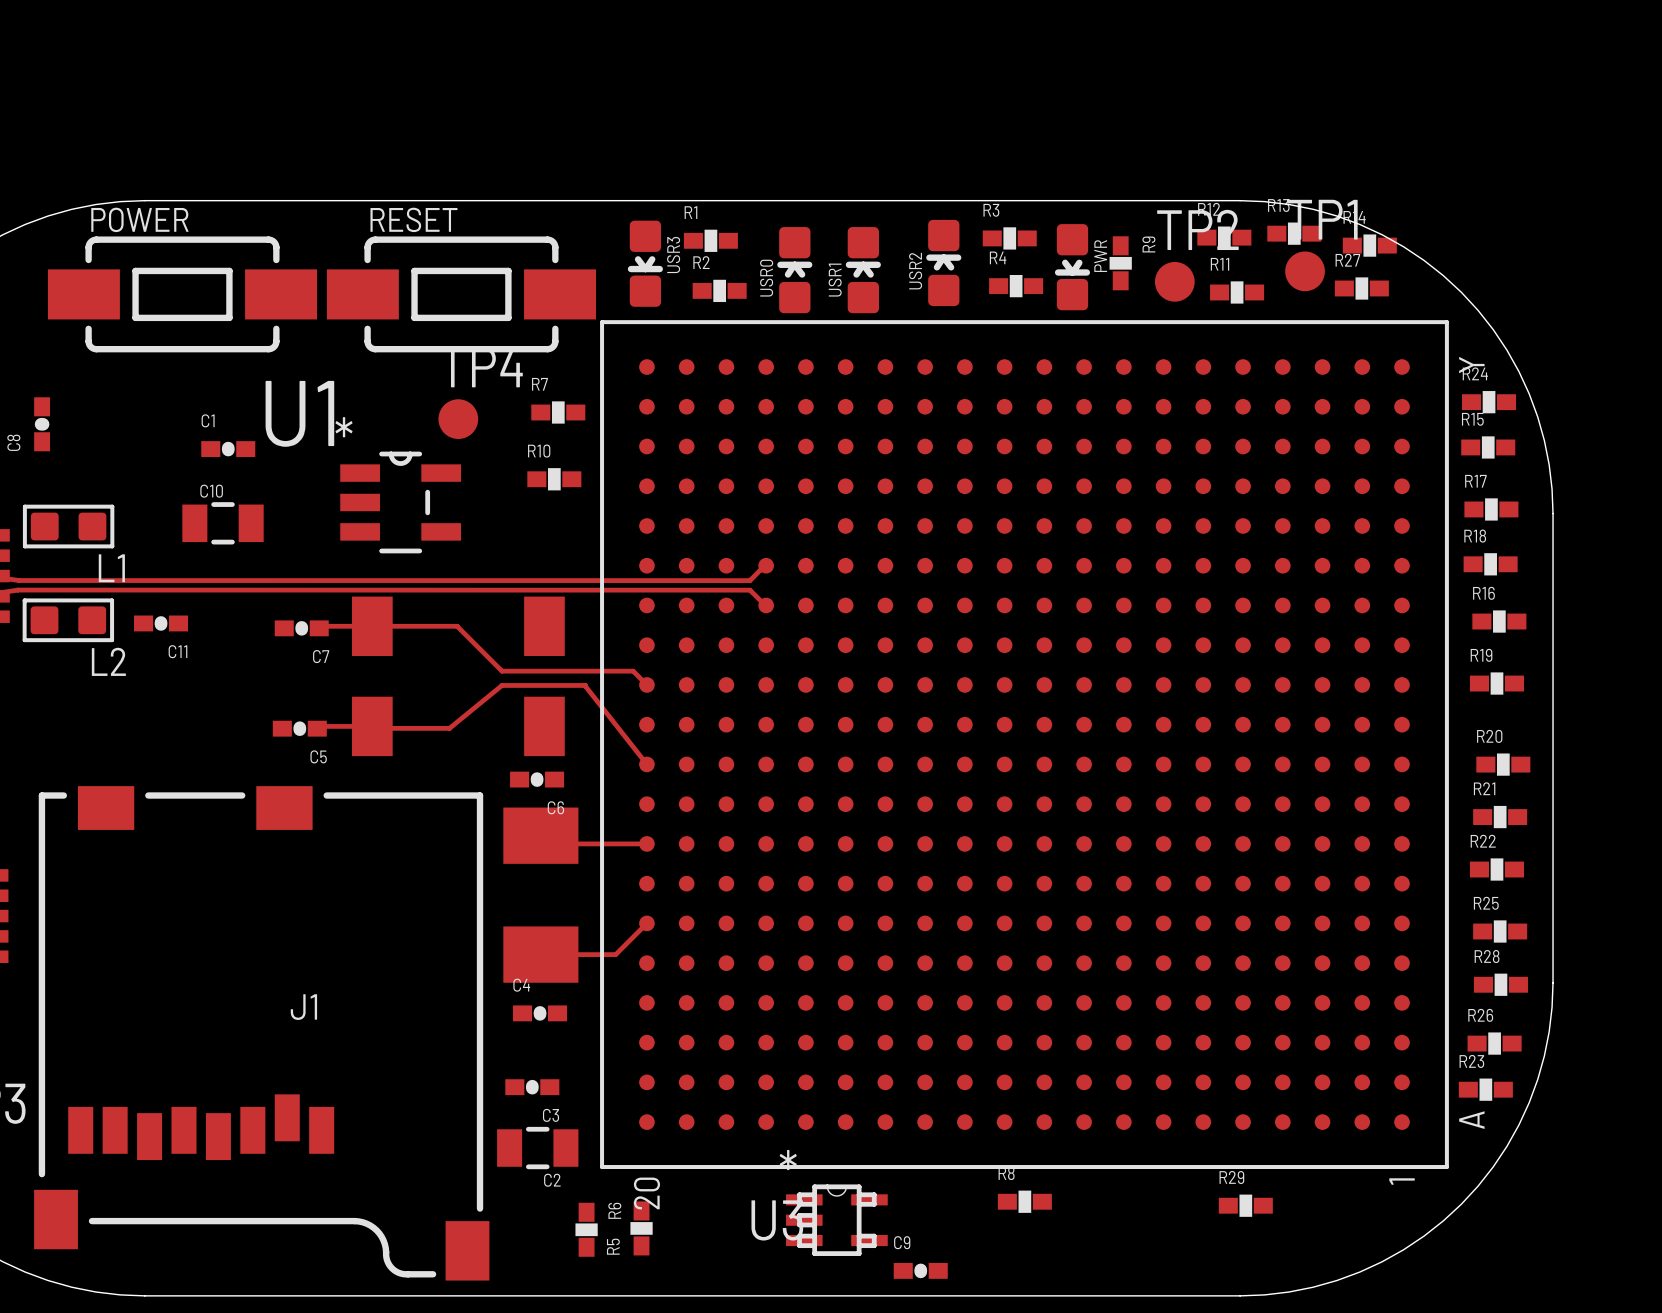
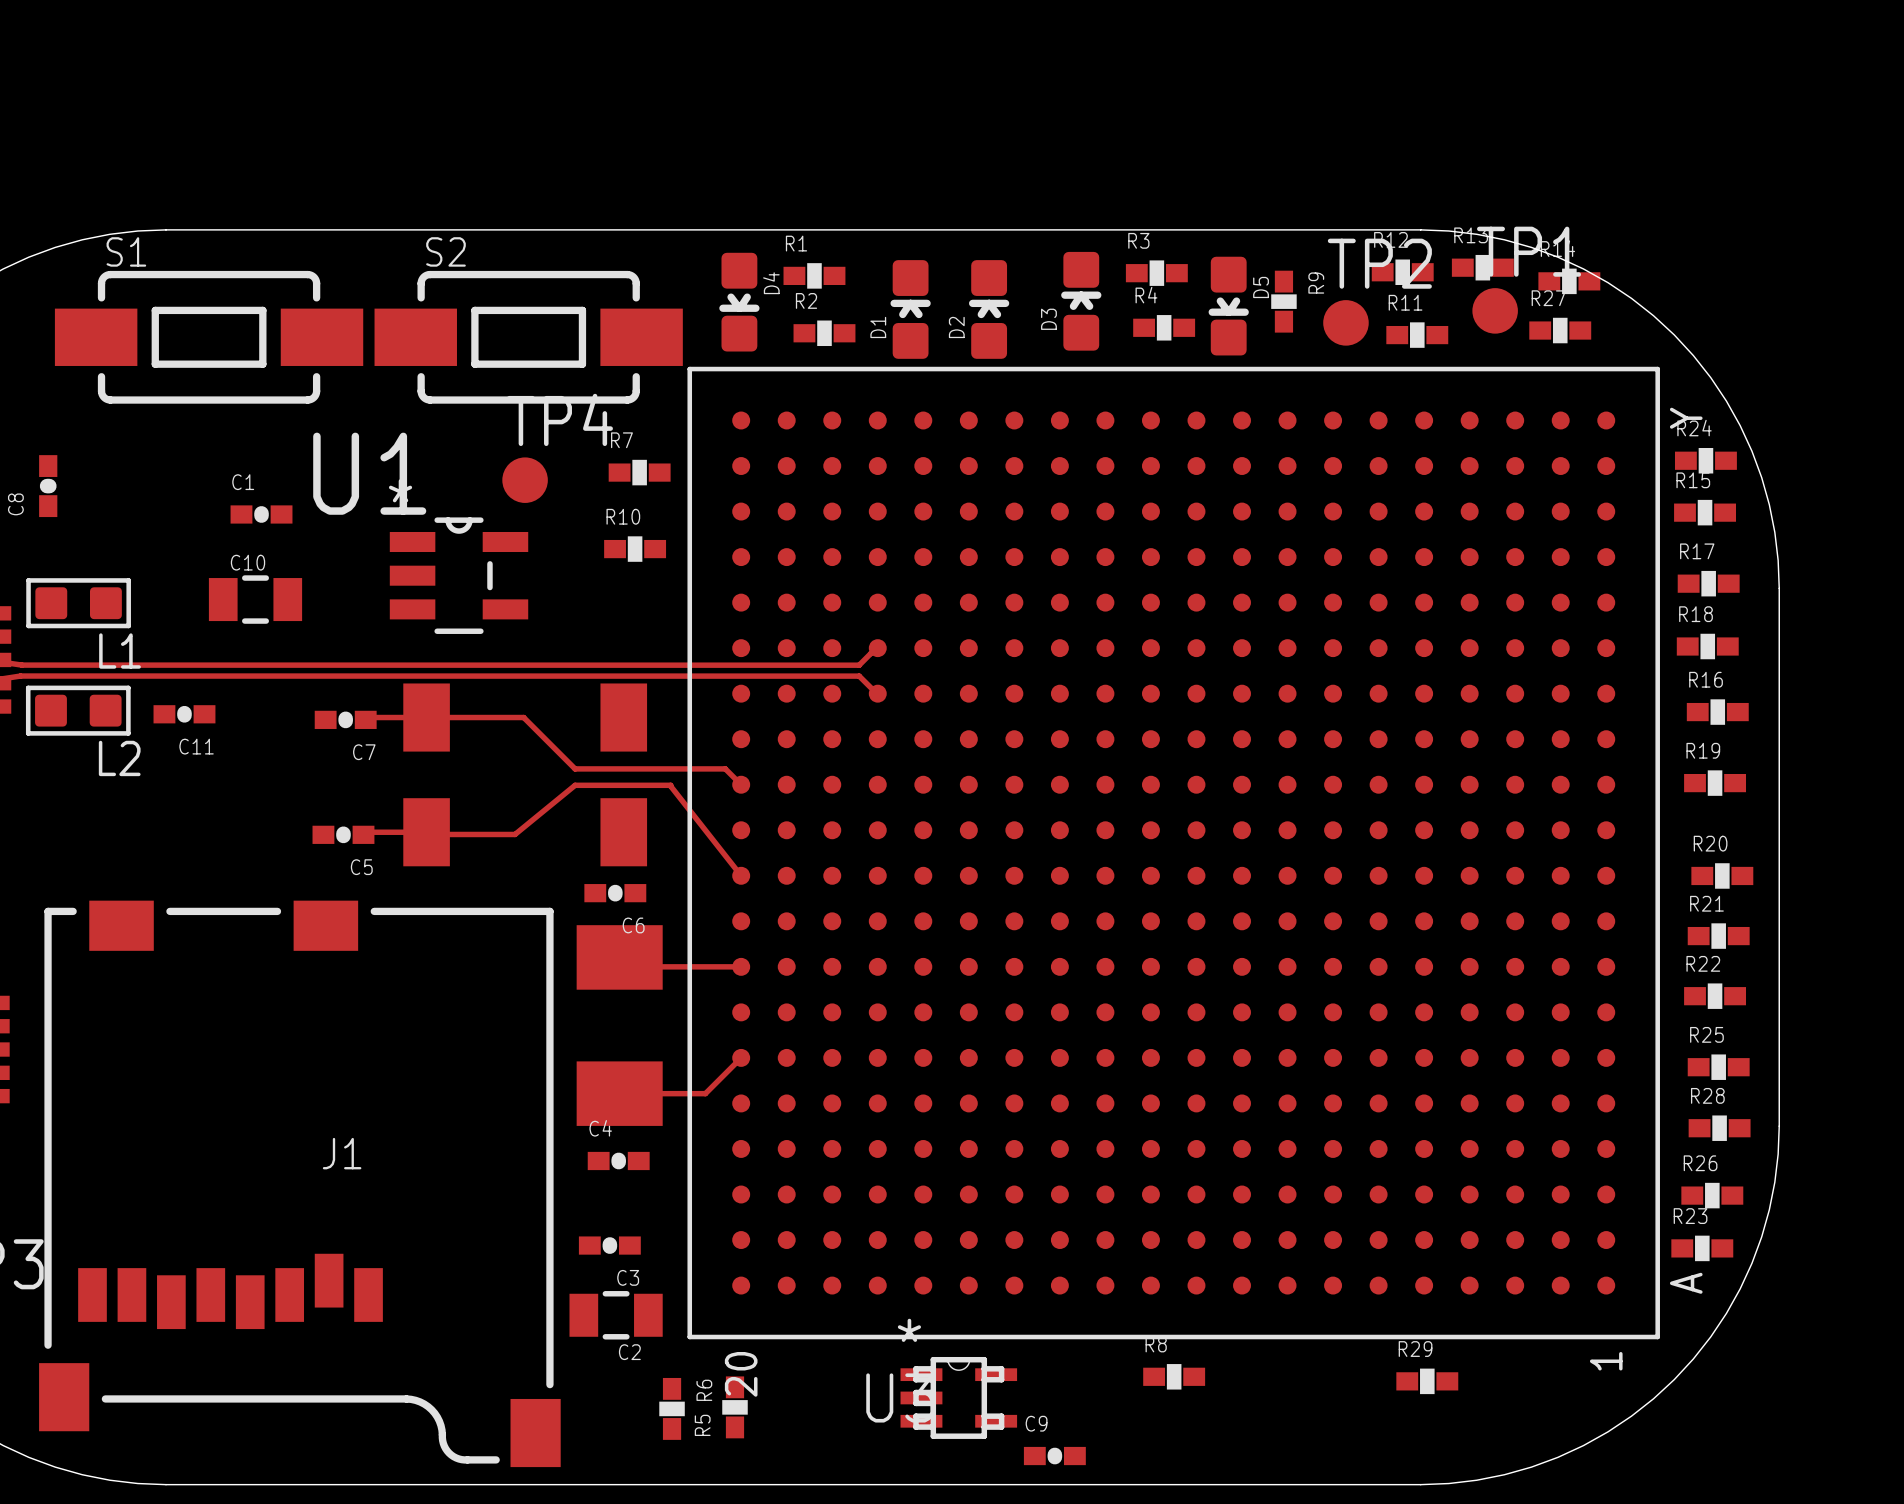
POWER name: POWER (139, 219) -> S1 (126, 251)
RESET name: RESET (413, 219) -> S2 (445, 251)
USR3 name: USR3 (673, 255) -> D4 (771, 283)
PWR name: PWR (1100, 256) -> D5 (1261, 287)
USR2 name: USR2 (915, 271) -> D3 (1048, 319)
USR0 name: USR0 (766, 278) -> D1 (878, 327)
USR1 name: USR1 (835, 280) -> D2 (956, 327)

